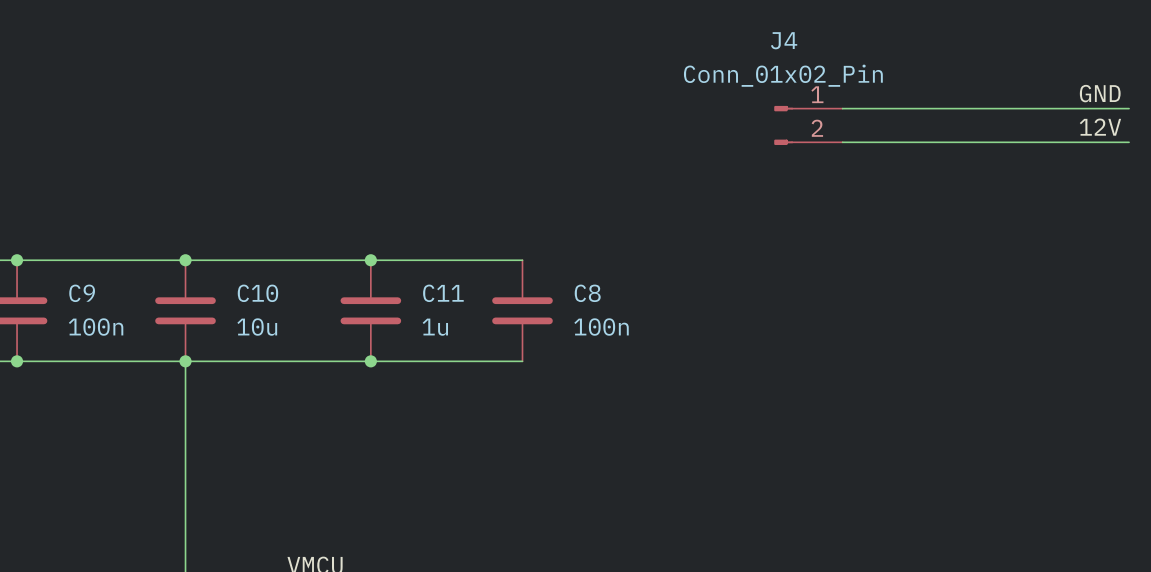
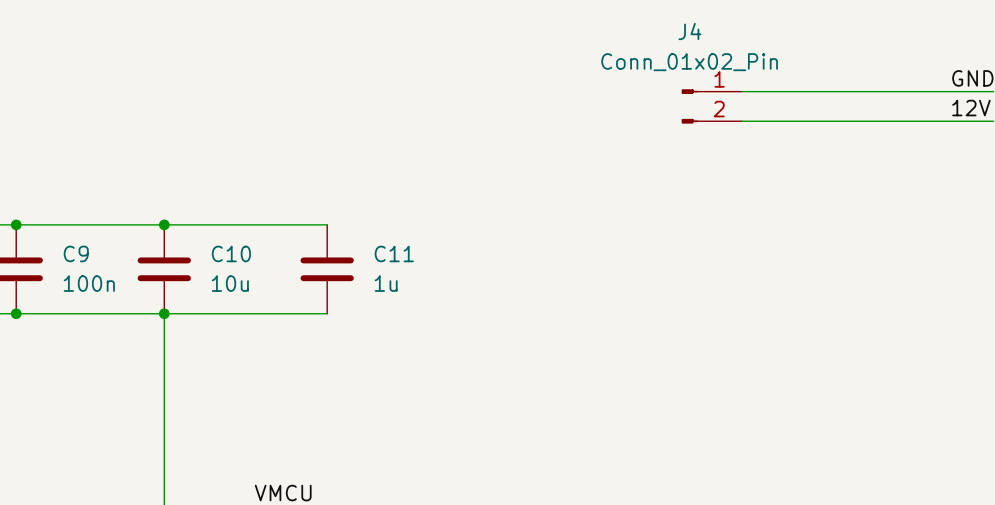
wire: (370, 260) (522, 260) -> none
junction: (370, 260) -> none
C8: 100n (522, 310) -> none
wire: (370, 361) (522, 361) -> none
junction: (370, 361) -> none

